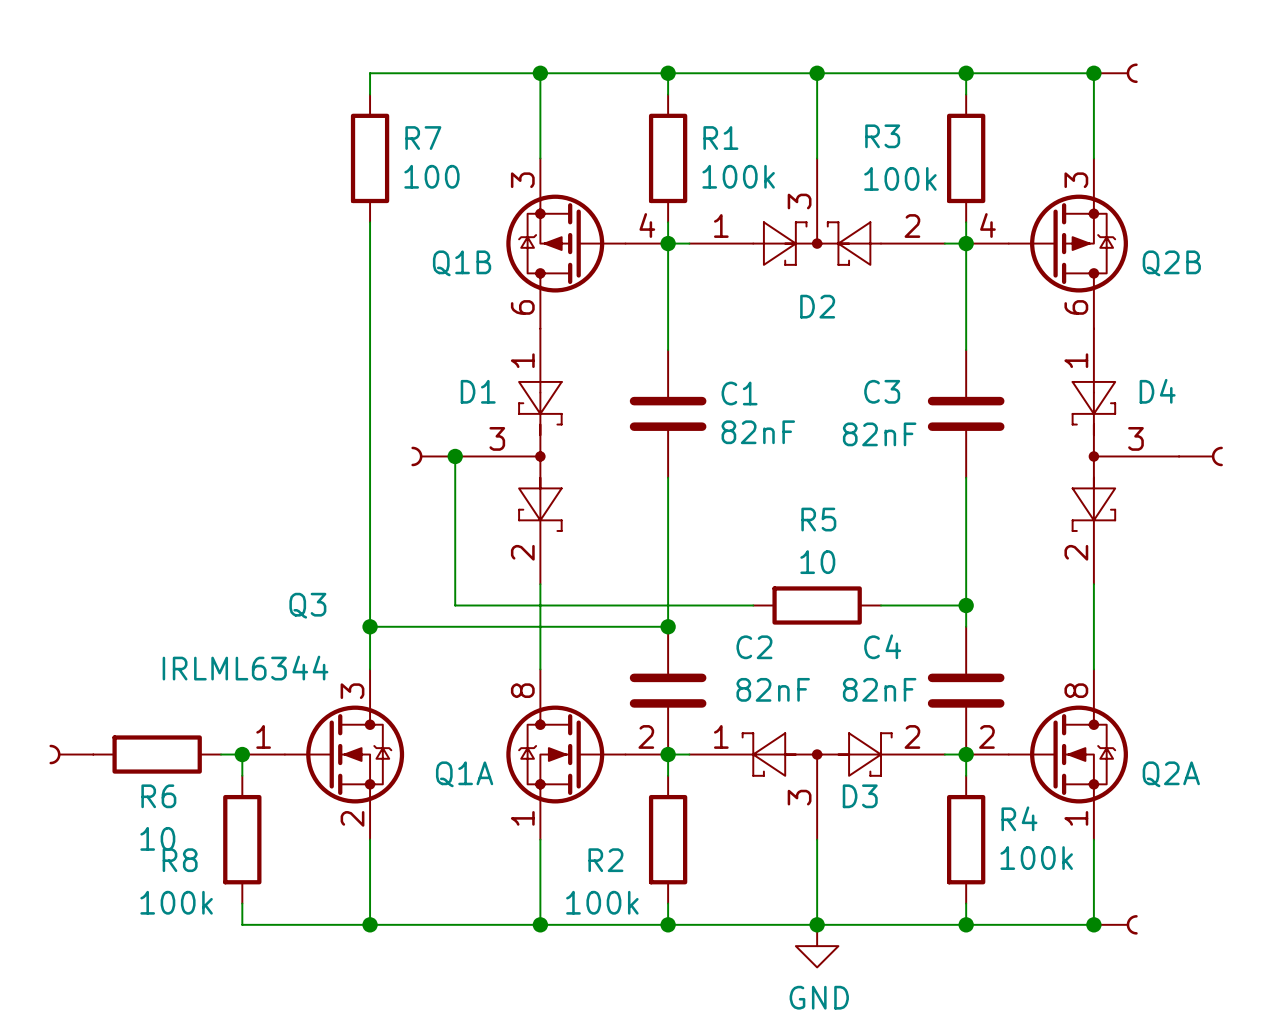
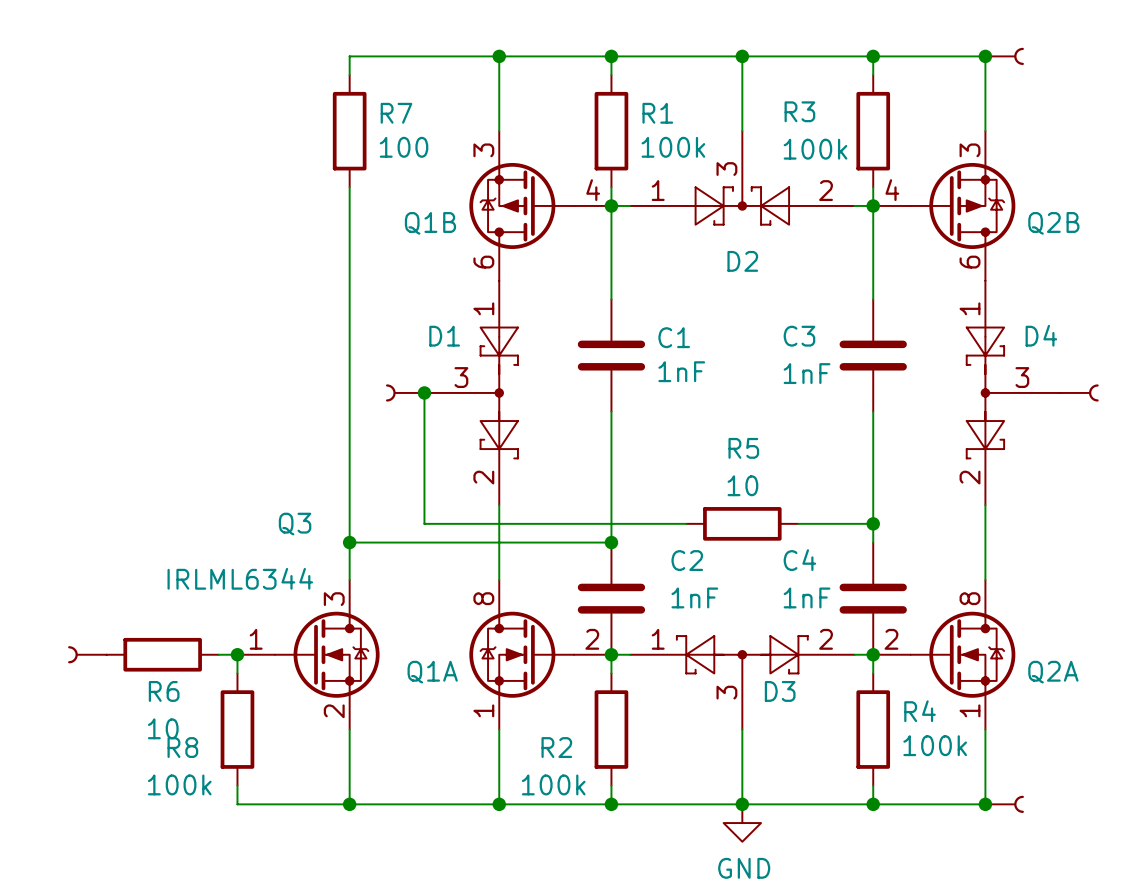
C1 value: 82nF (758, 432) -> 1nF (681, 371)
C3 value: 82nF (879, 434) -> 1nF (807, 373)
C2 value: 82nF (773, 689) -> 1nF (694, 597)
C4 value: 82nF (879, 689) -> 1nF (807, 597)

